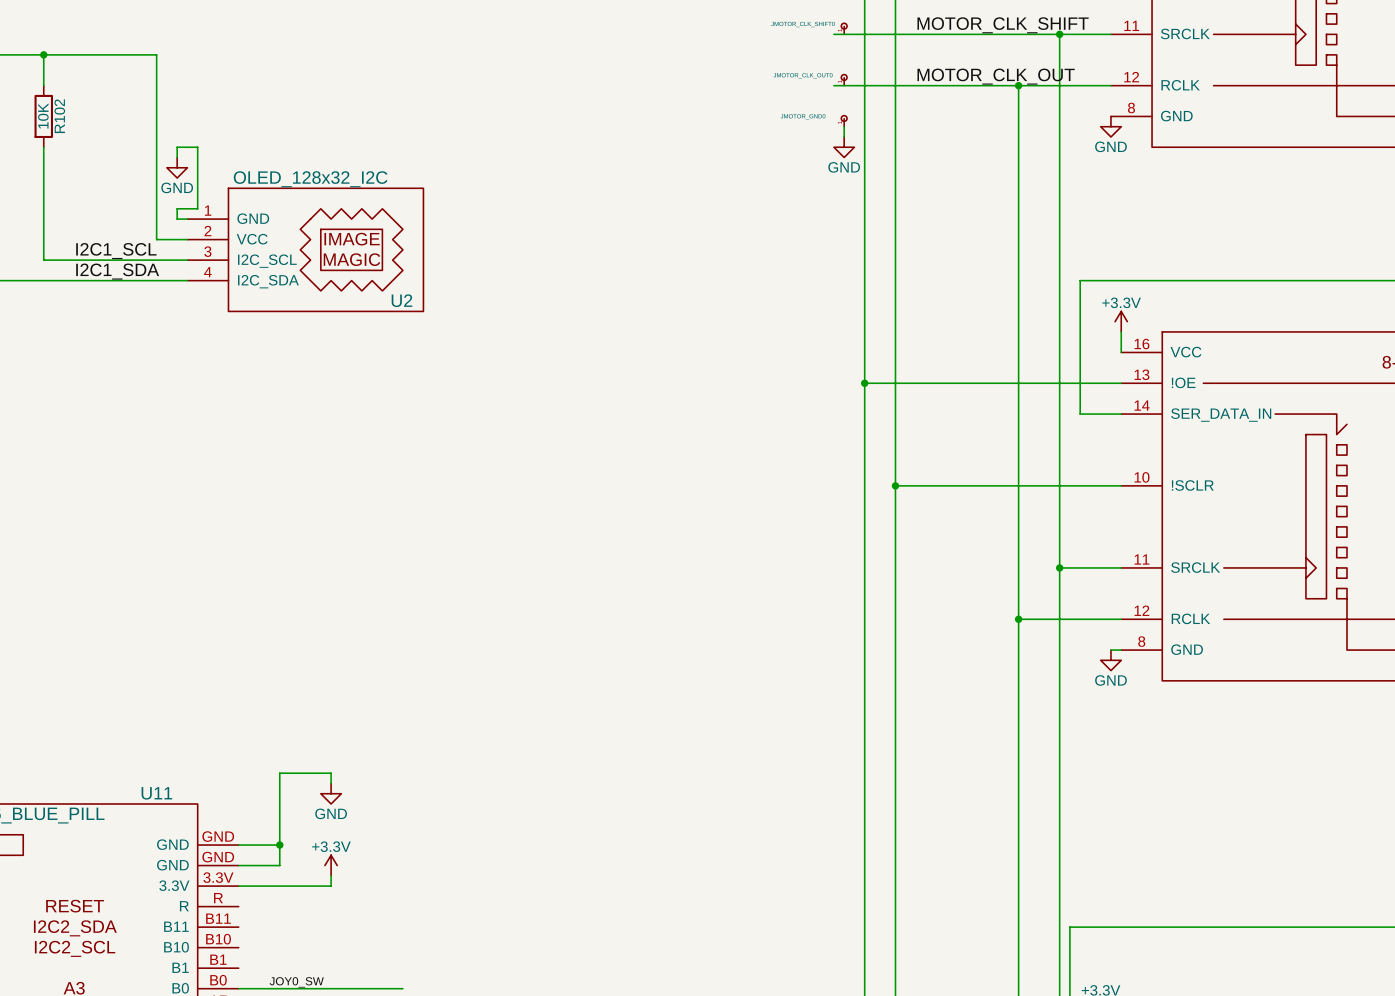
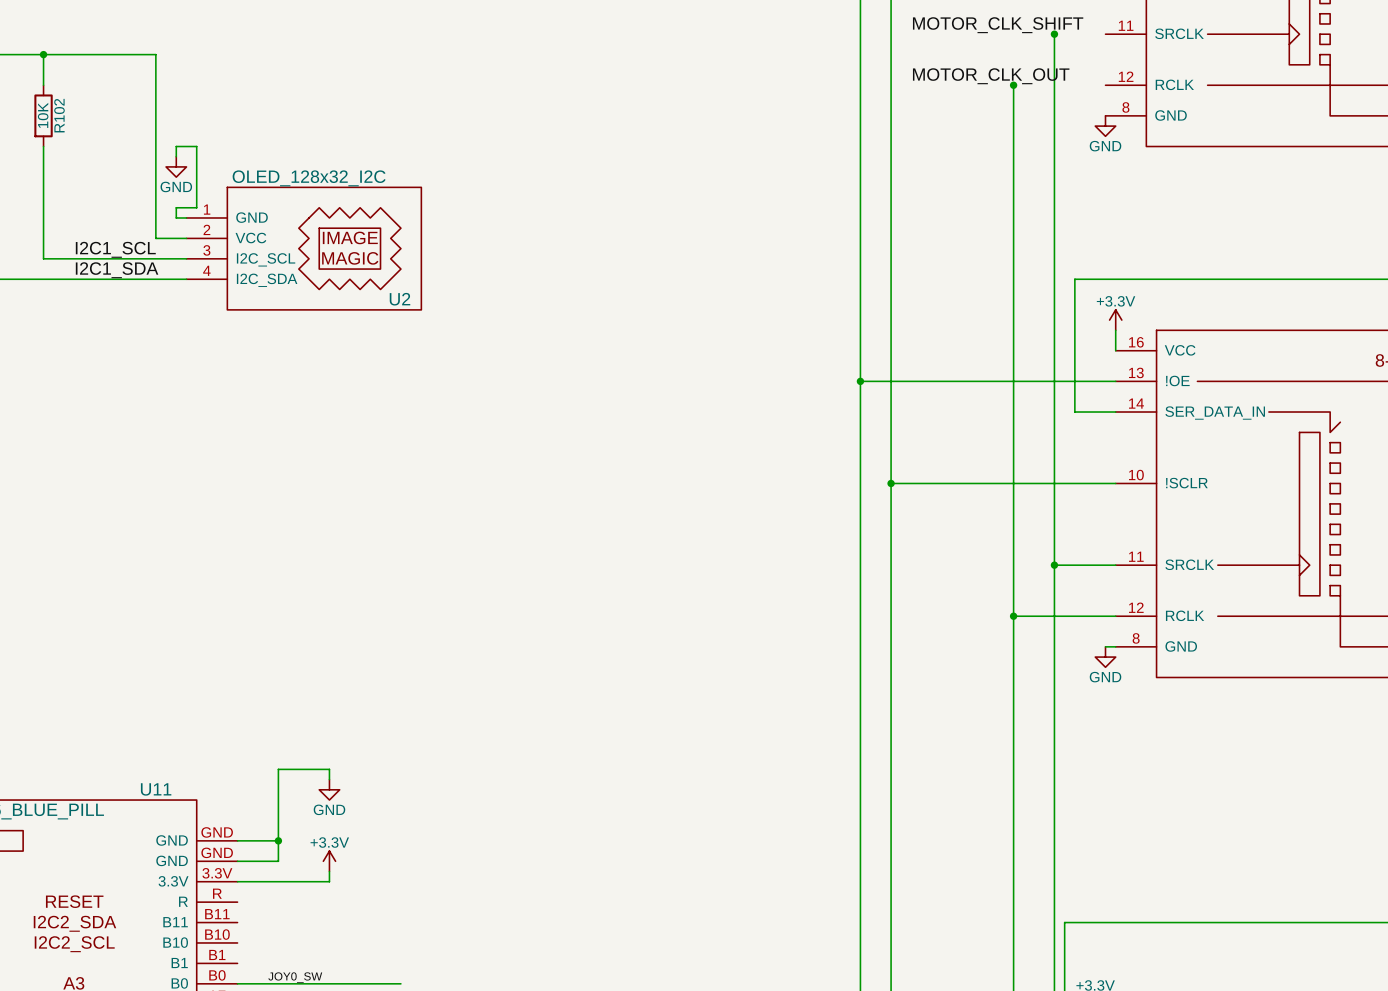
part: (844, 28) -> none
wire: (833, 34) (1110, 34) -> none
part: (844, 80) -> none
wire: (833, 85) (1110, 85) -> none
part: (844, 121) -> none
wire: (844, 126) (844, 136) -> none
power symbol: GND (844, 147) -> none

